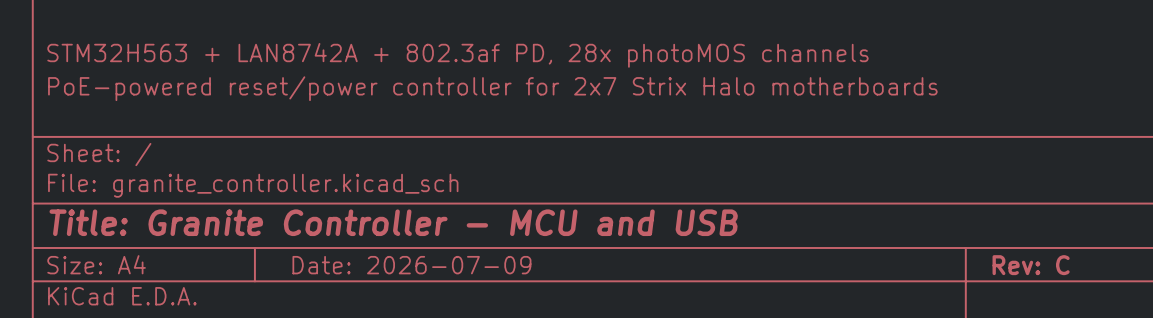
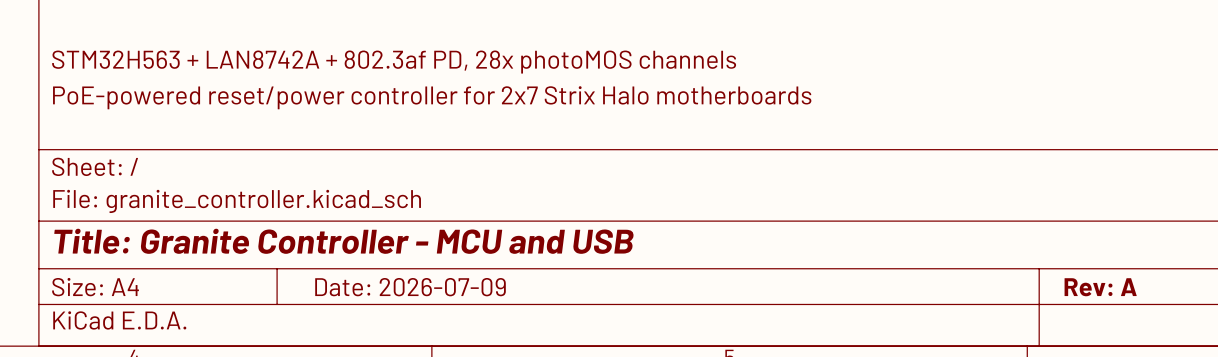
title block: Rev: C (1031, 265) -> Rev: A (1100, 287)

